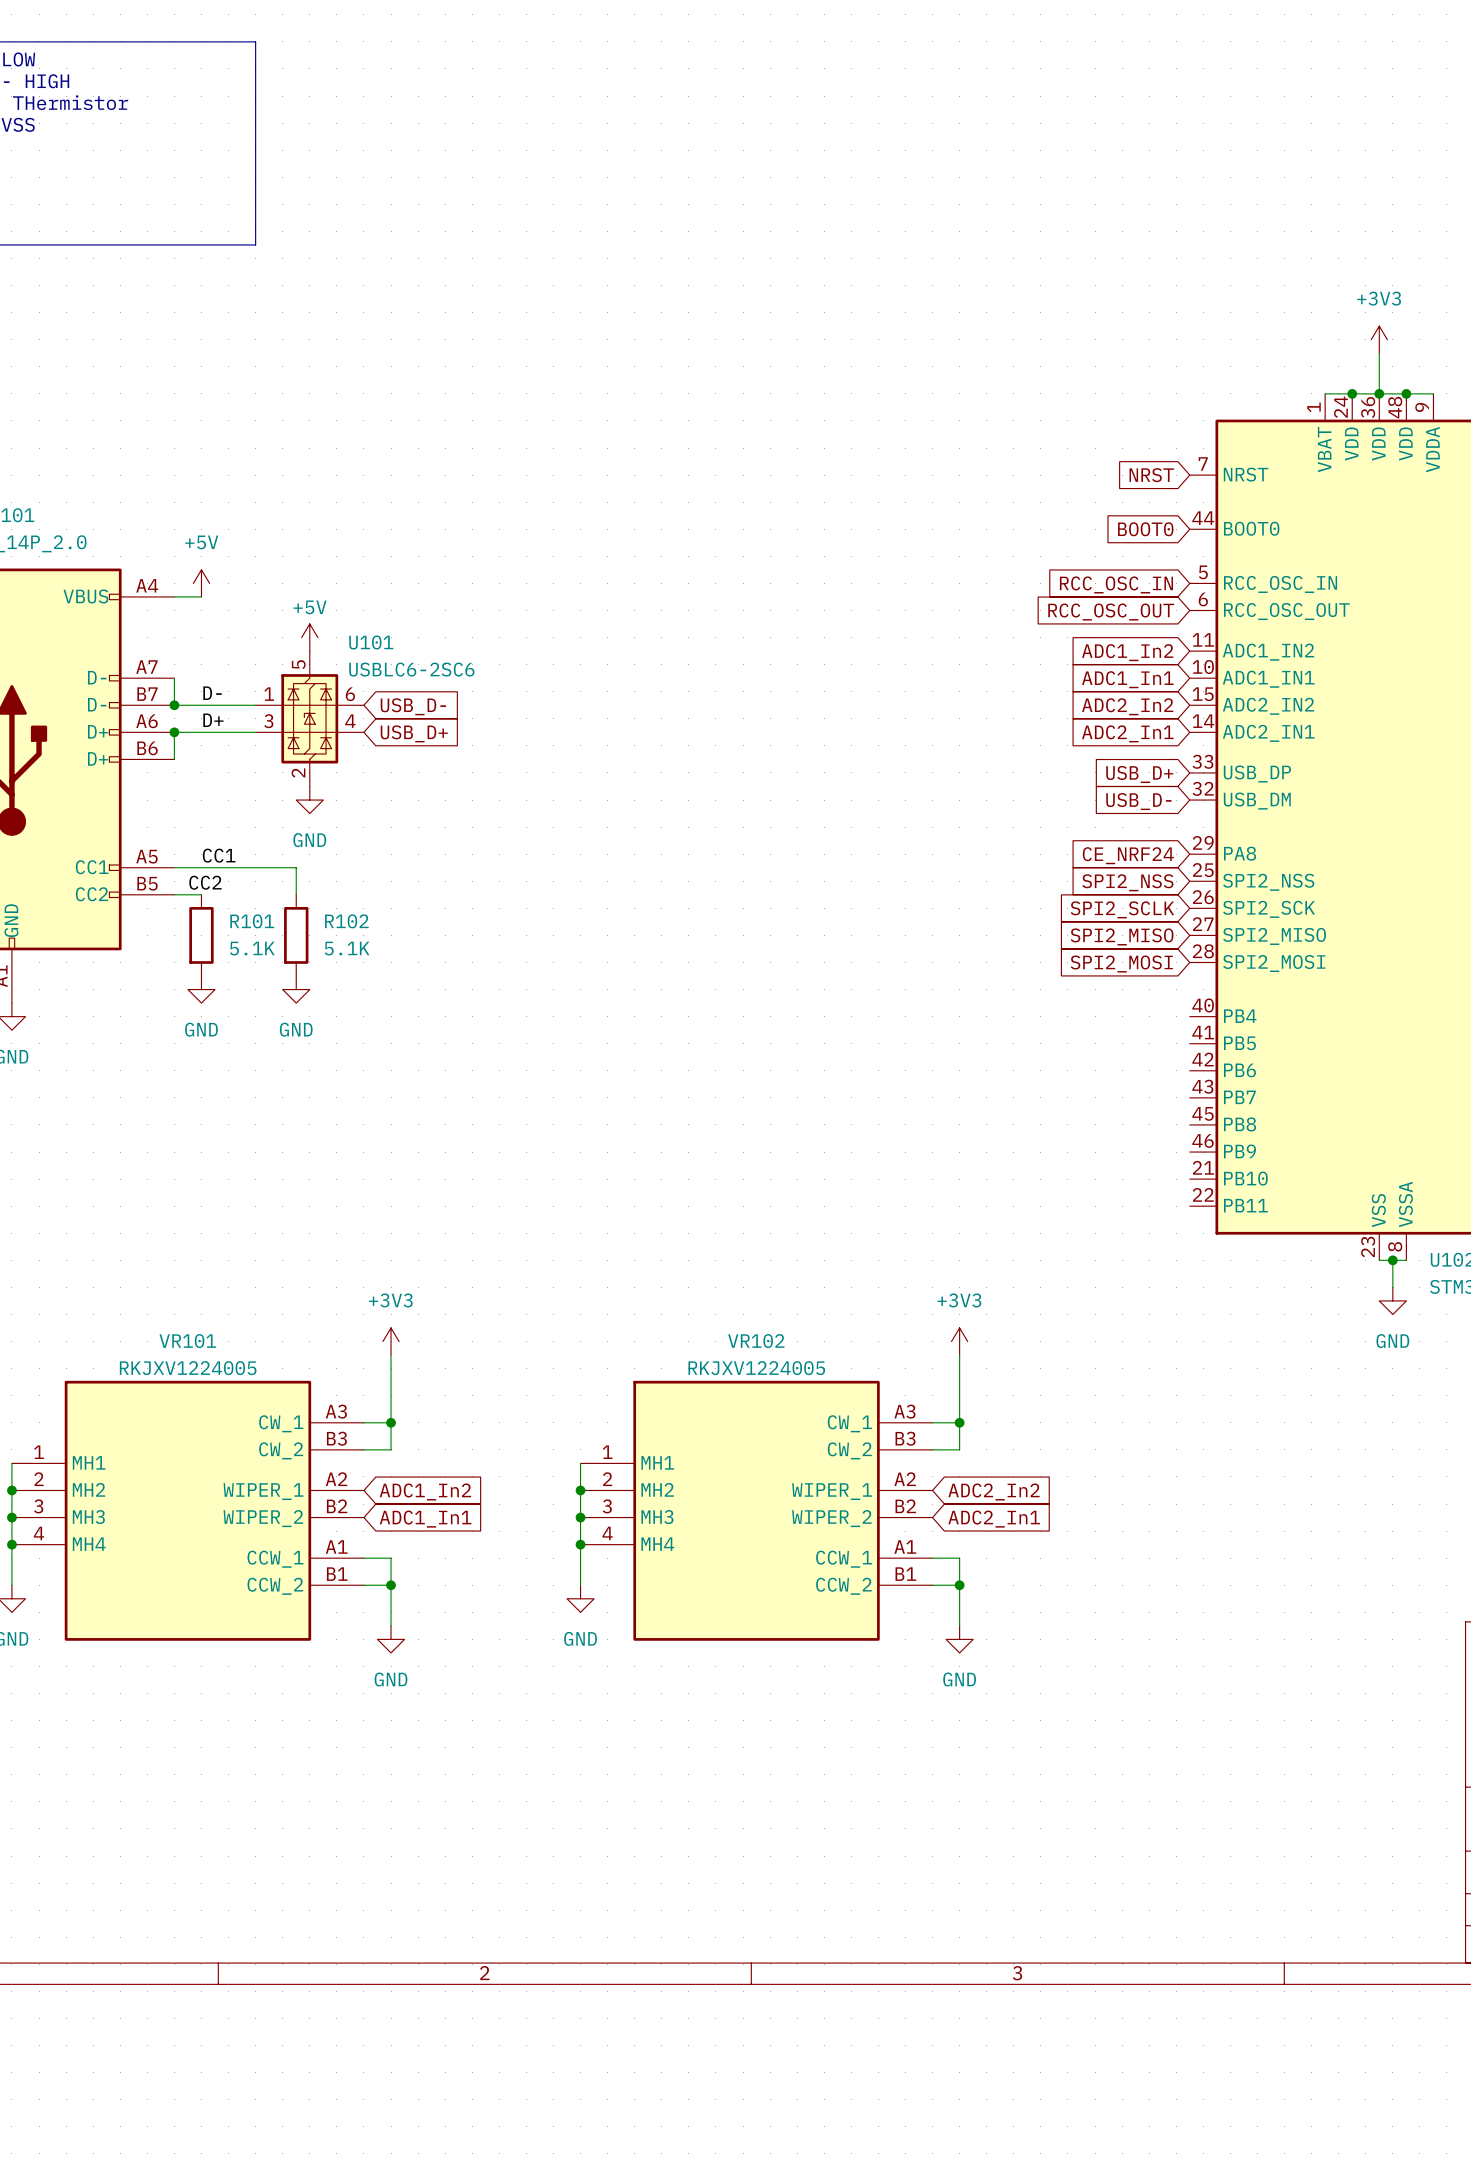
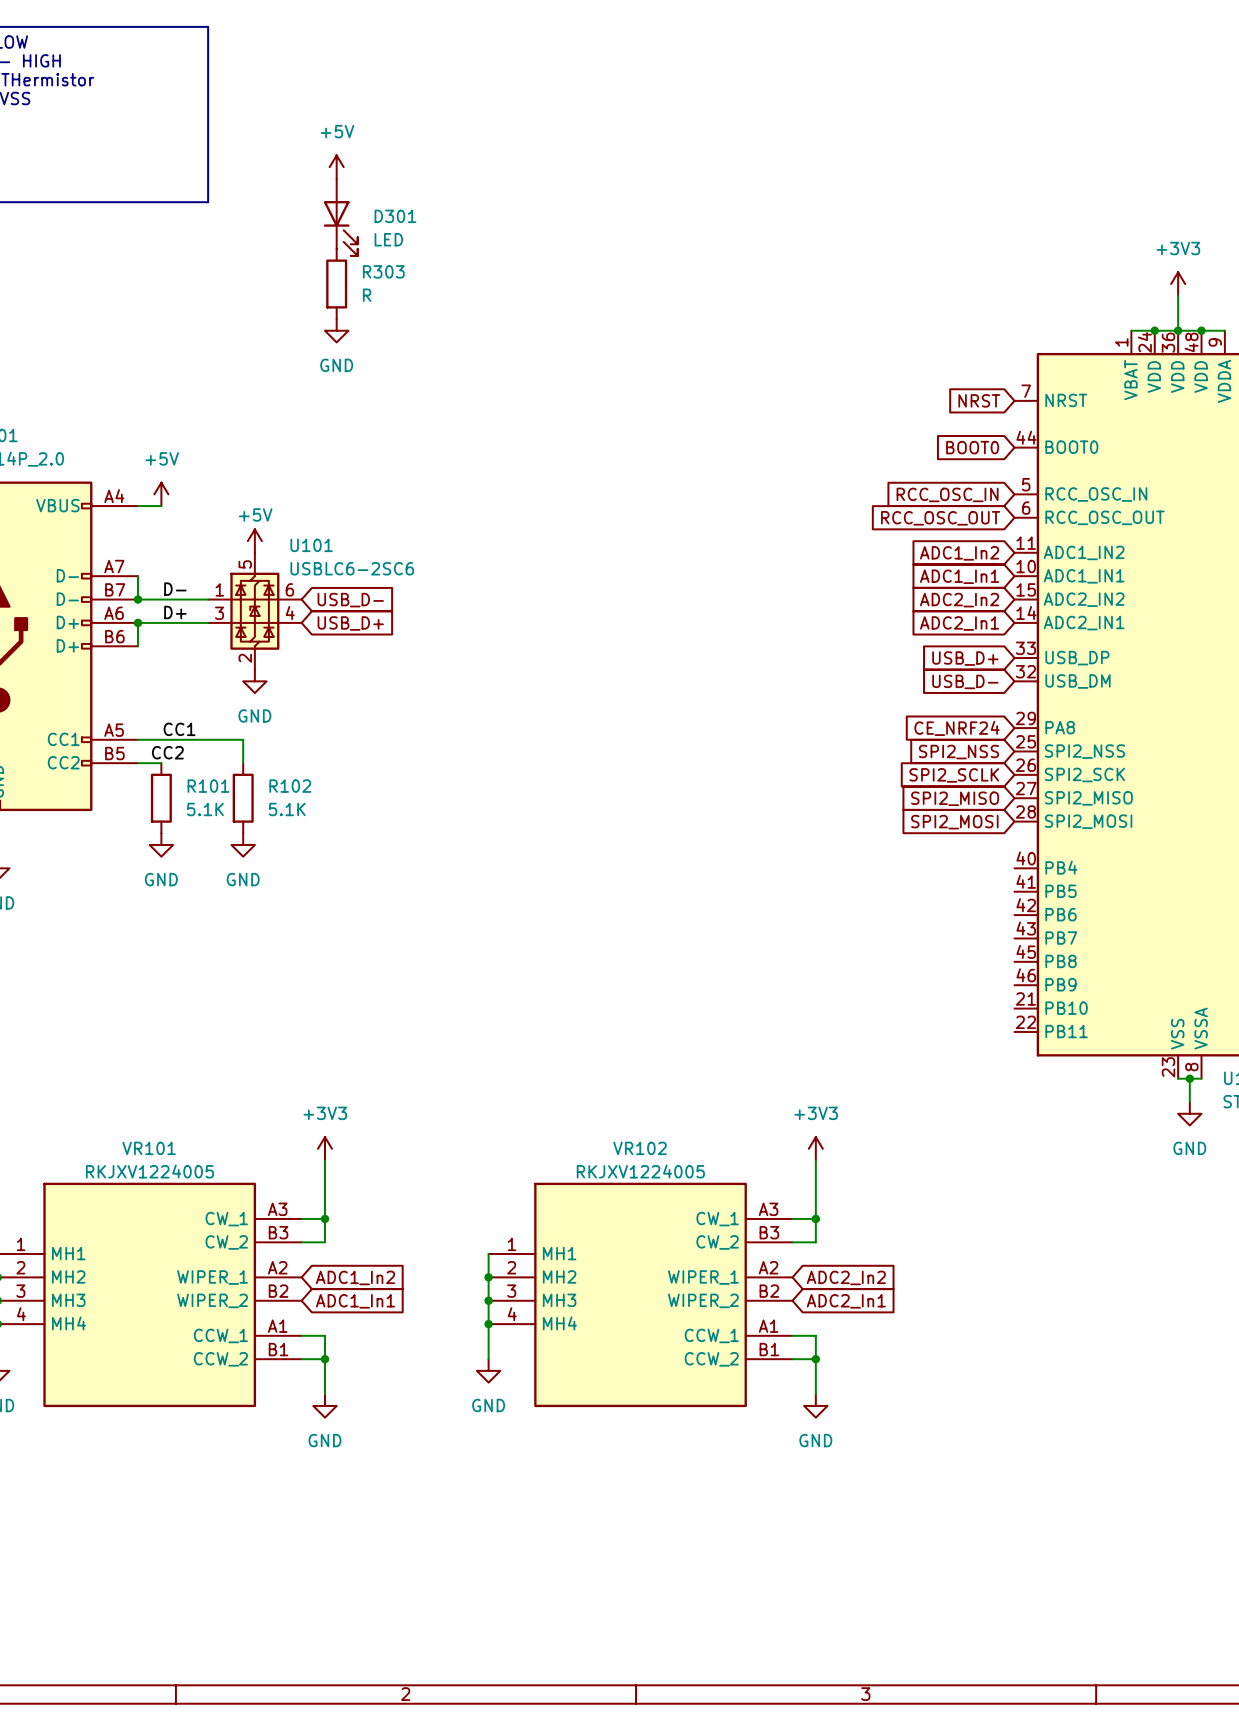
power symbol: none -> +5V (336, 167)
D301: none -> LED (340, 217)
R303: none -> R (336, 284)
power symbol: none -> GND (336, 330)

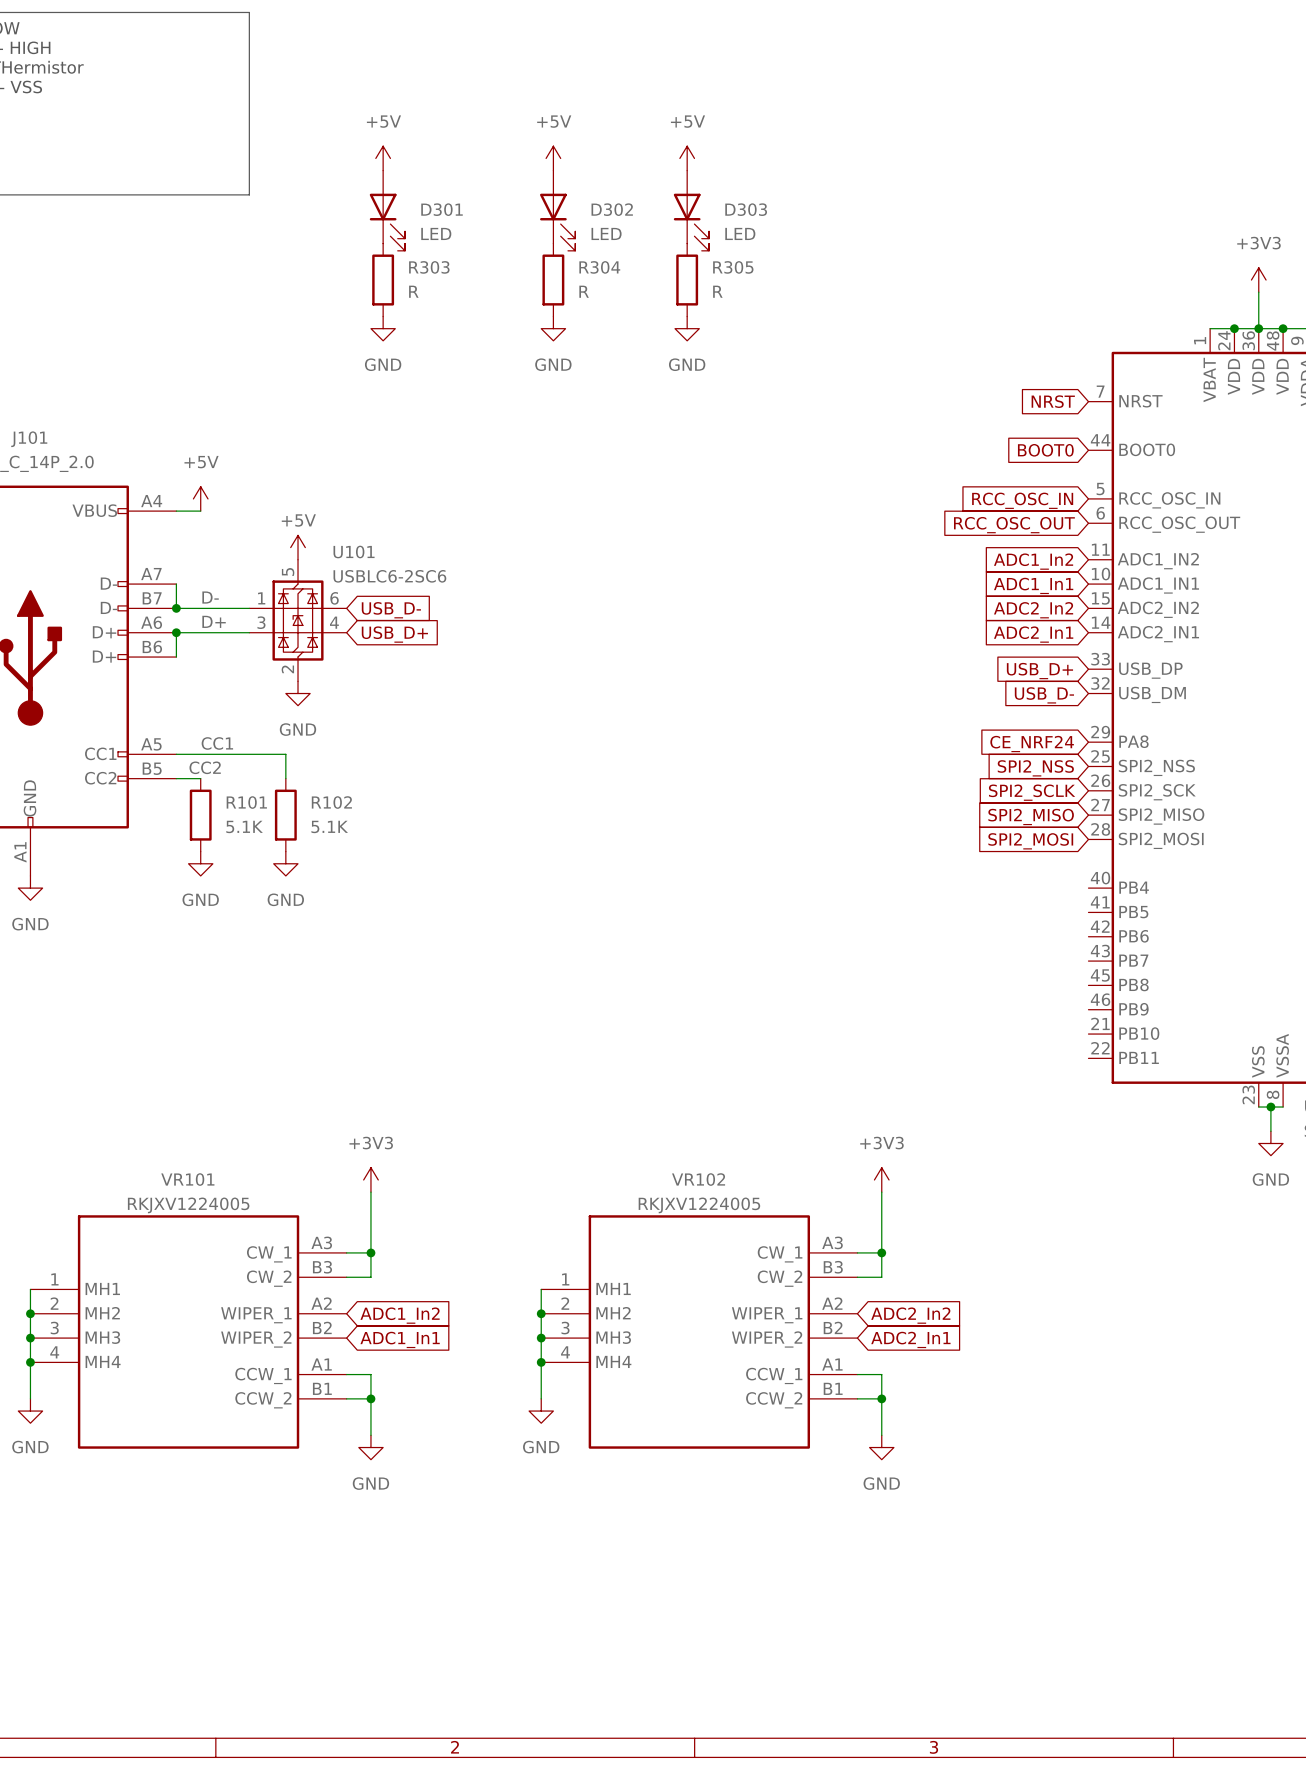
power symbol: none -> +5V (553, 158)
power symbol: none -> +5V (687, 158)
D302: none -> LED (557, 210)
D303: none -> LED (691, 210)
R304: none -> R (553, 280)
R305: none -> R (687, 280)
power symbol: none -> GND (553, 328)
power symbol: none -> GND (687, 328)

